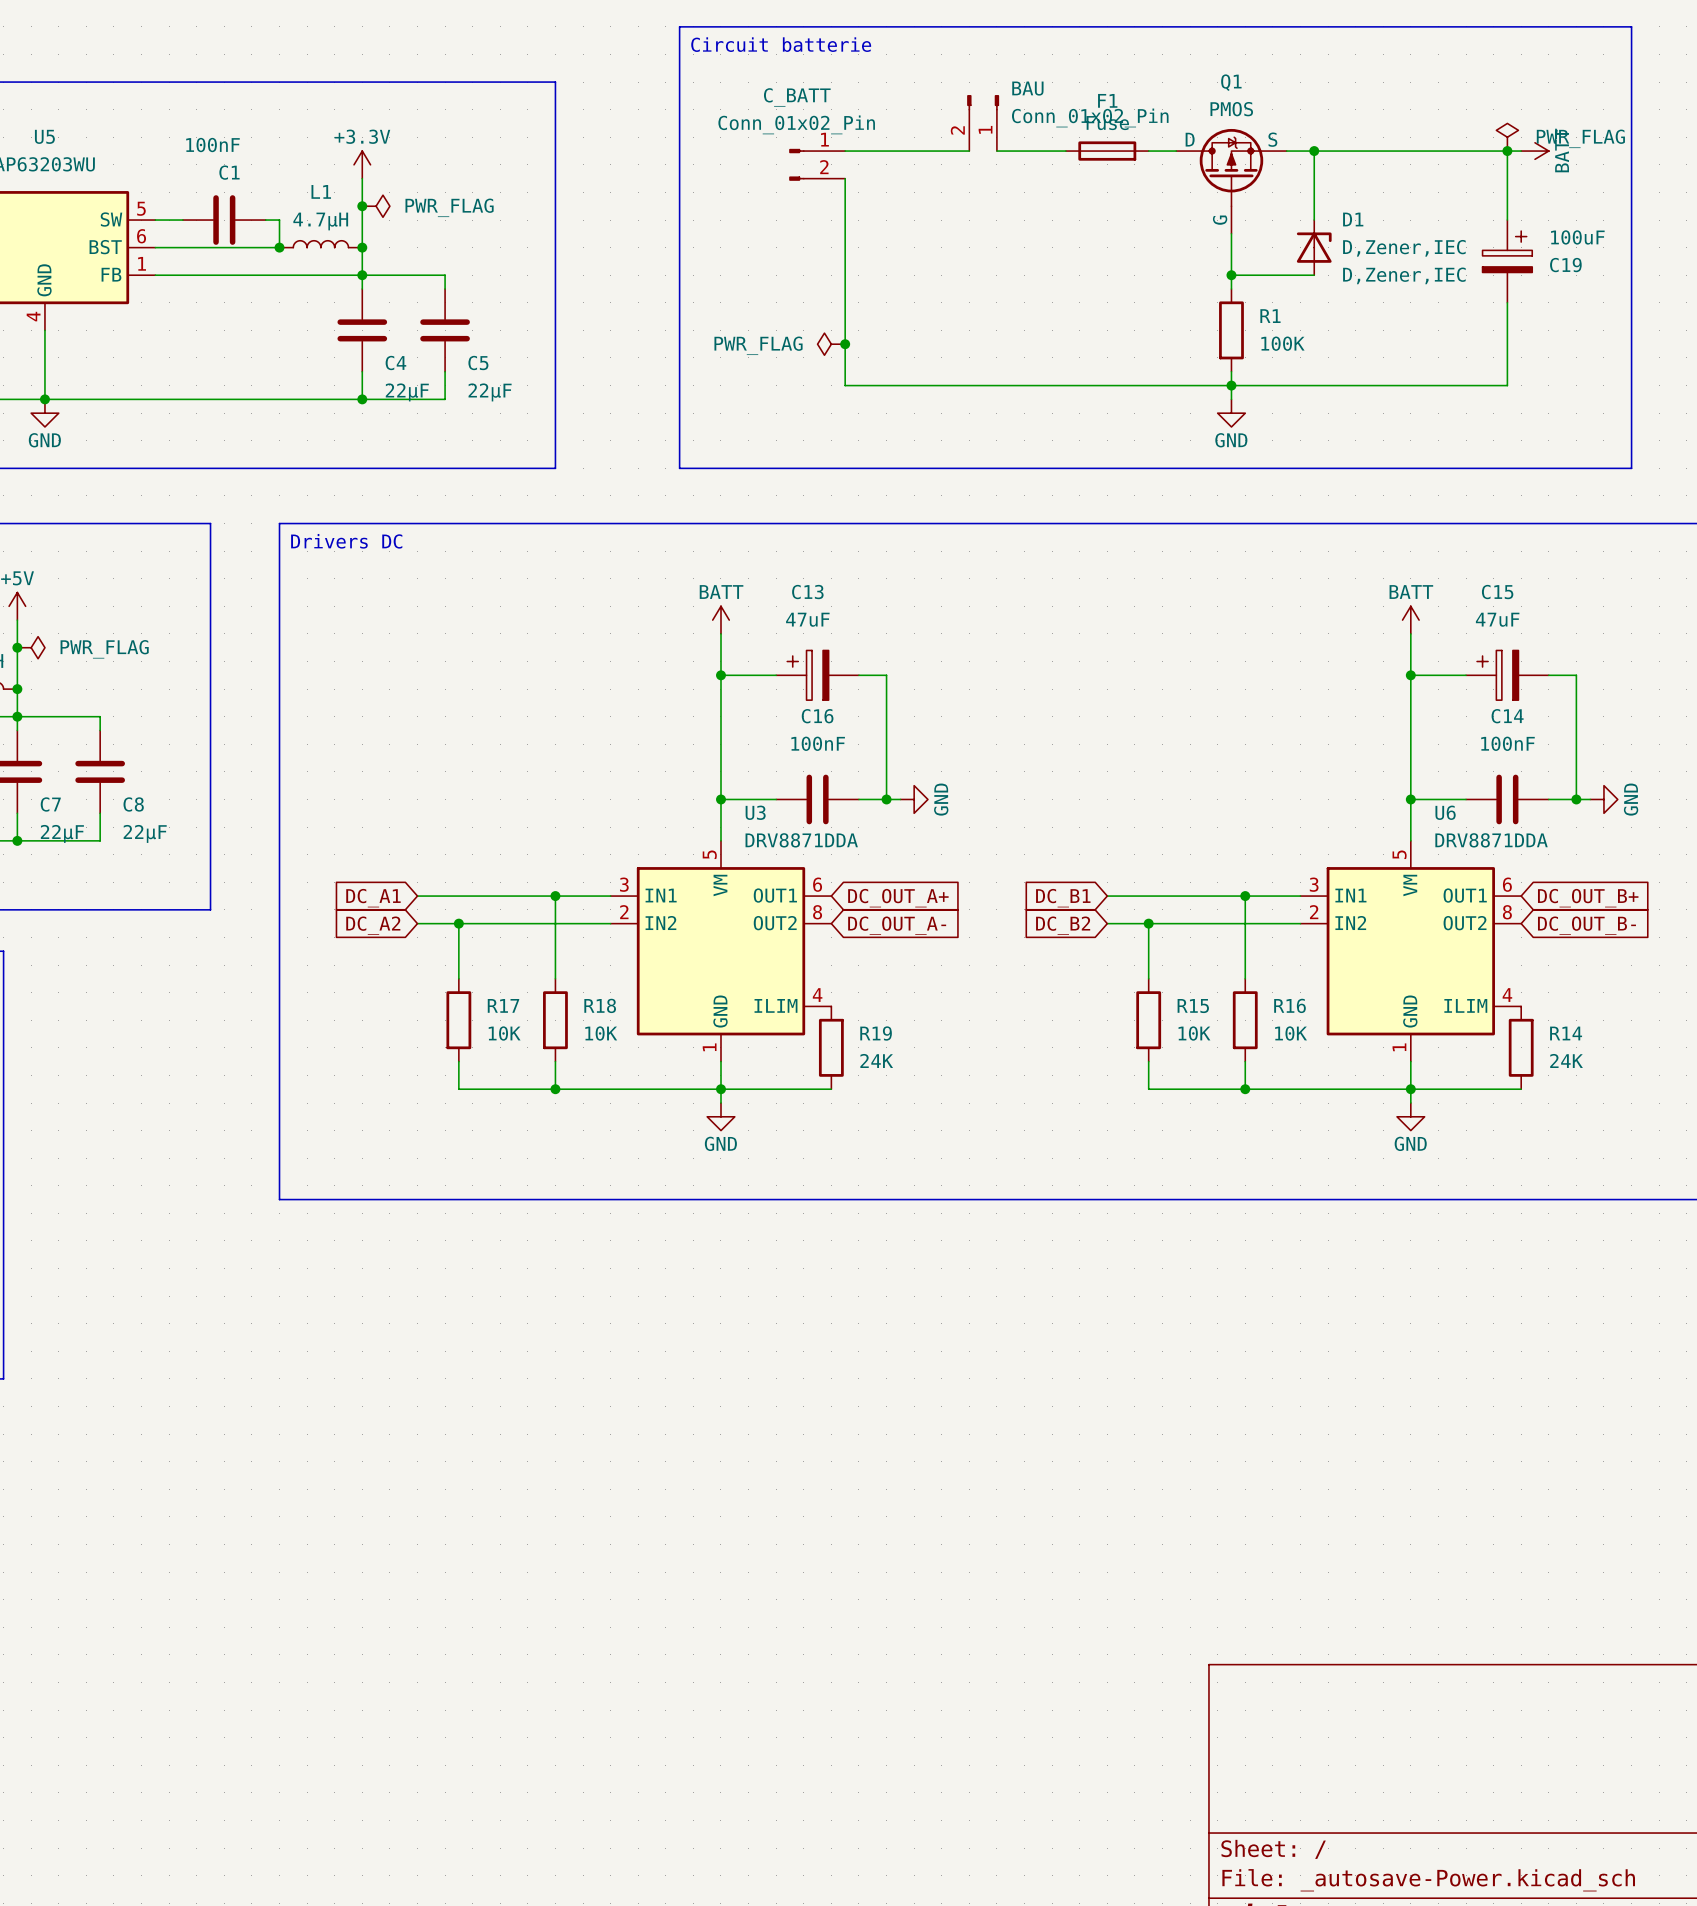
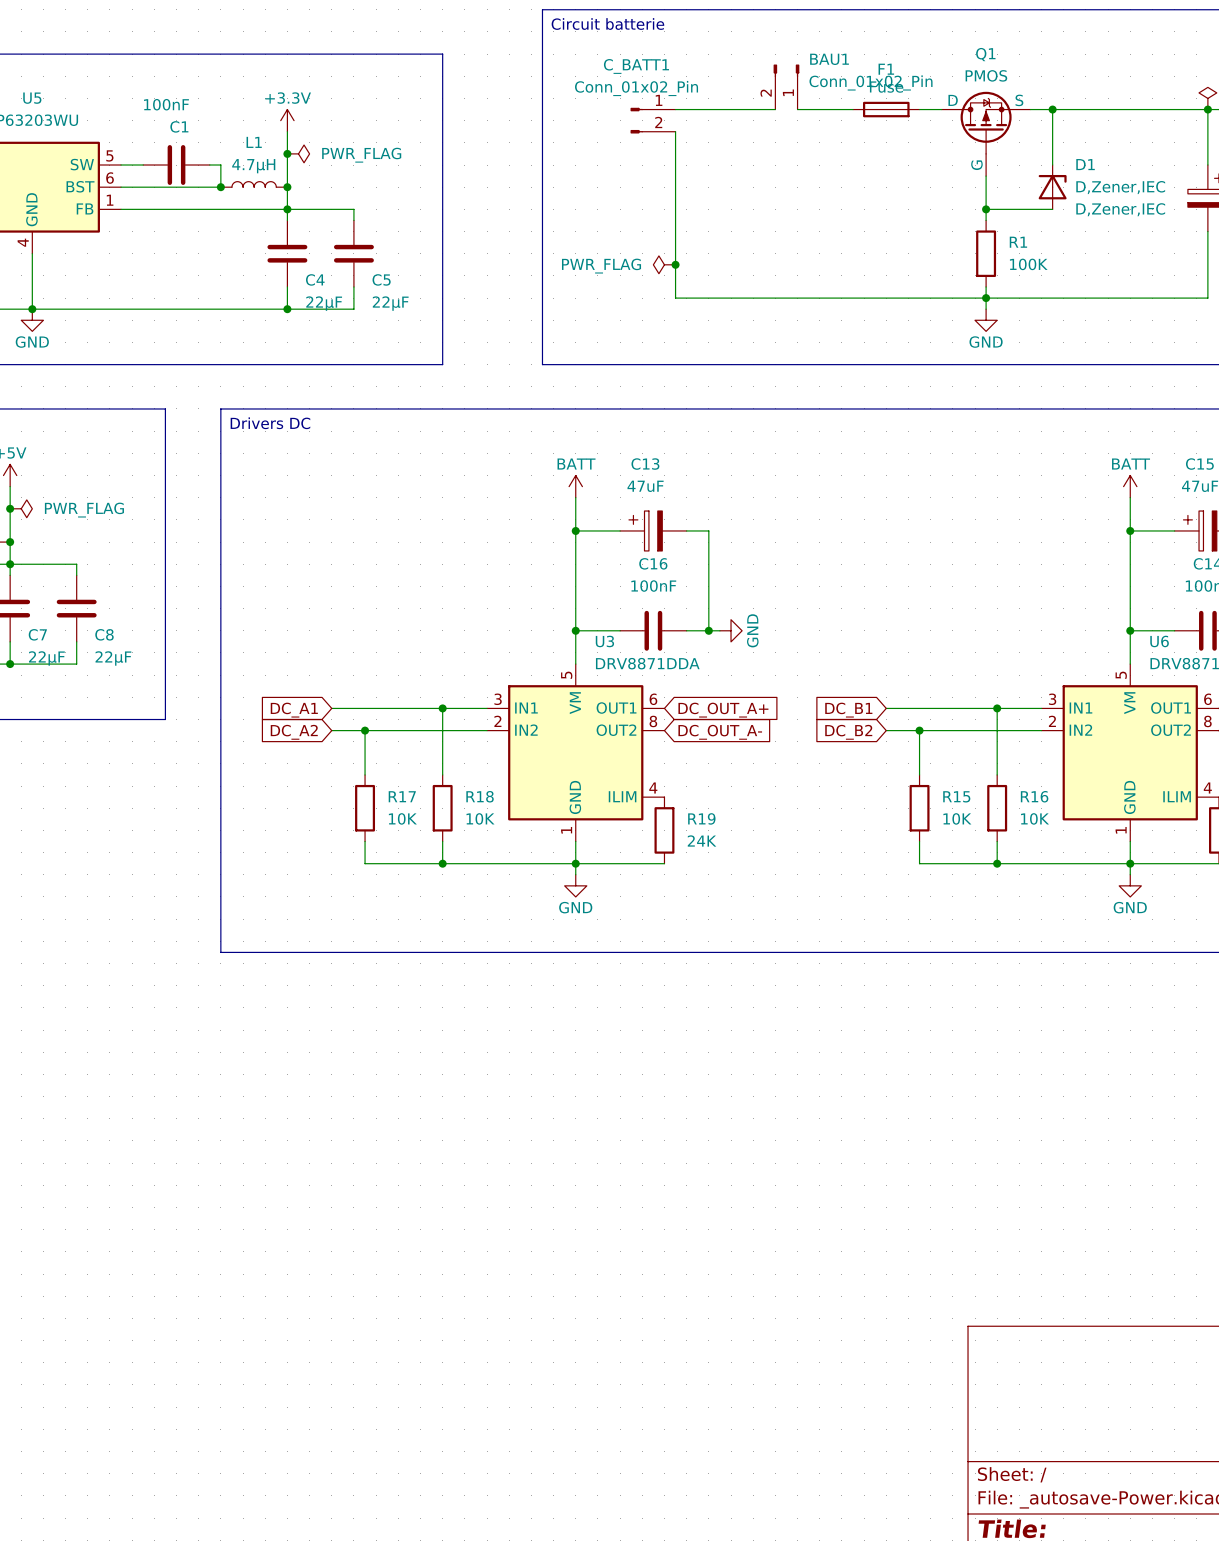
BAU name: BAU (1027, 88) -> BAU1 (829, 59)
C_BATT name: C_BATT (797, 97) -> C_BATT1 (636, 66)

